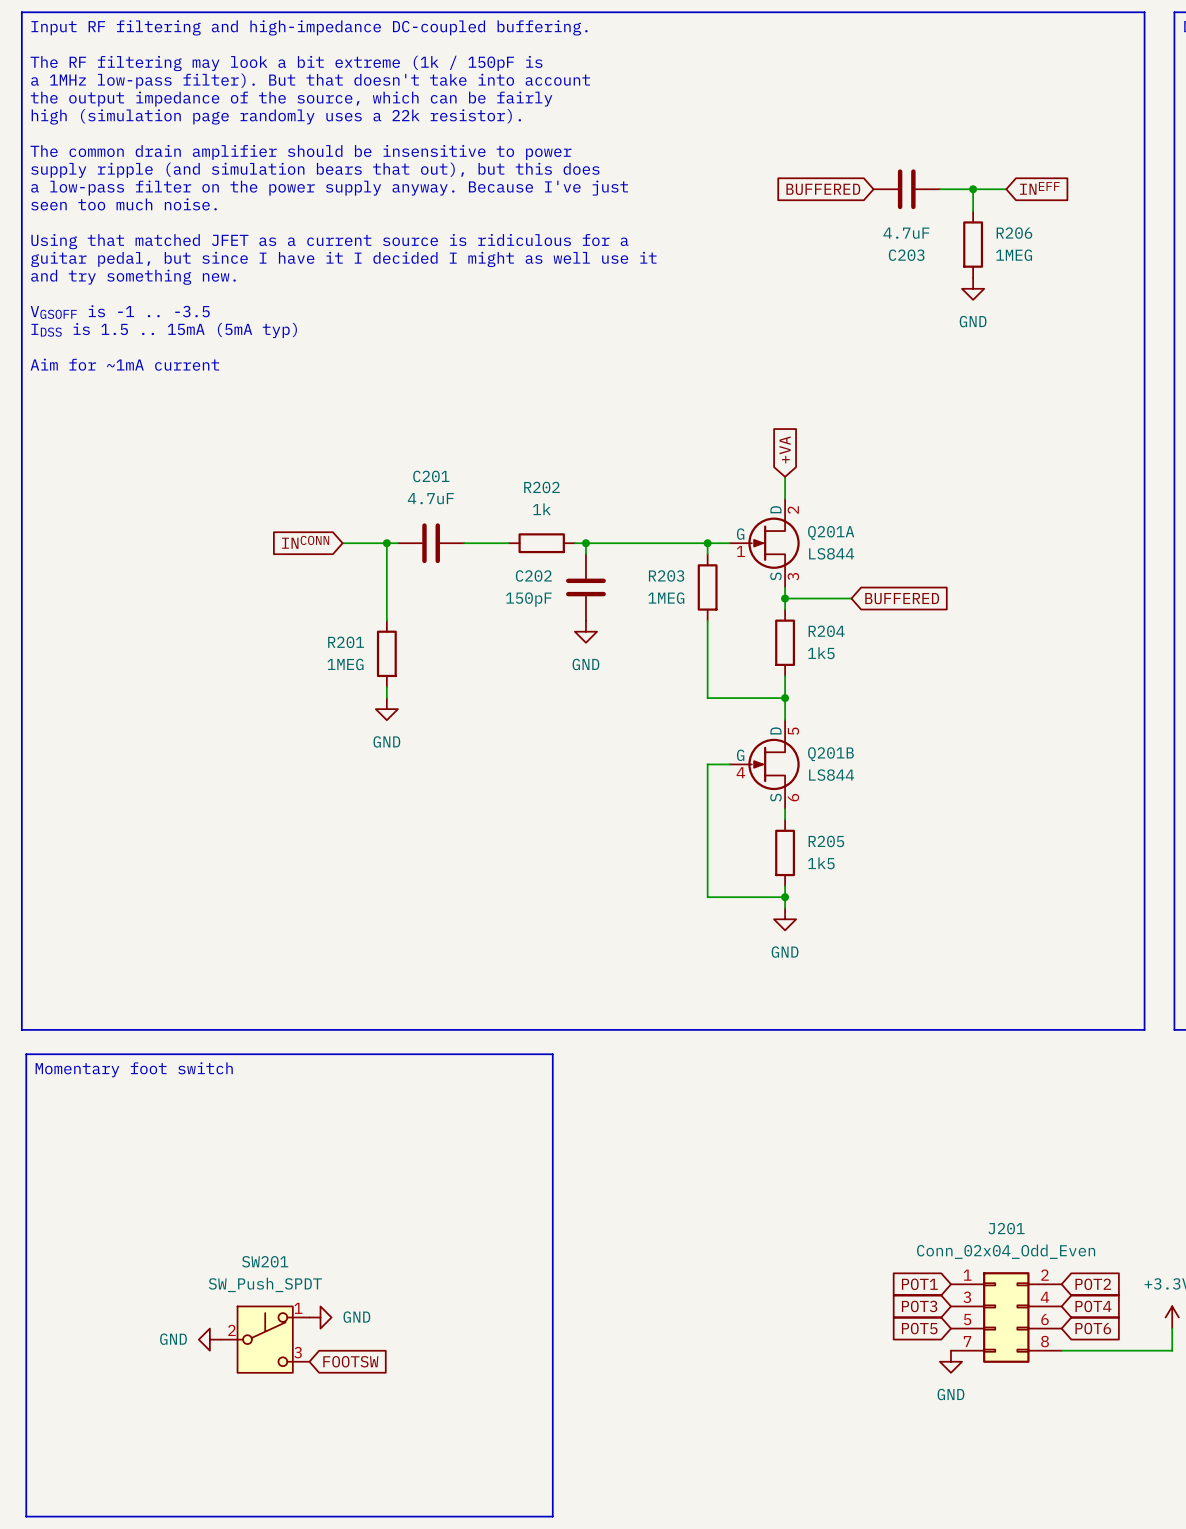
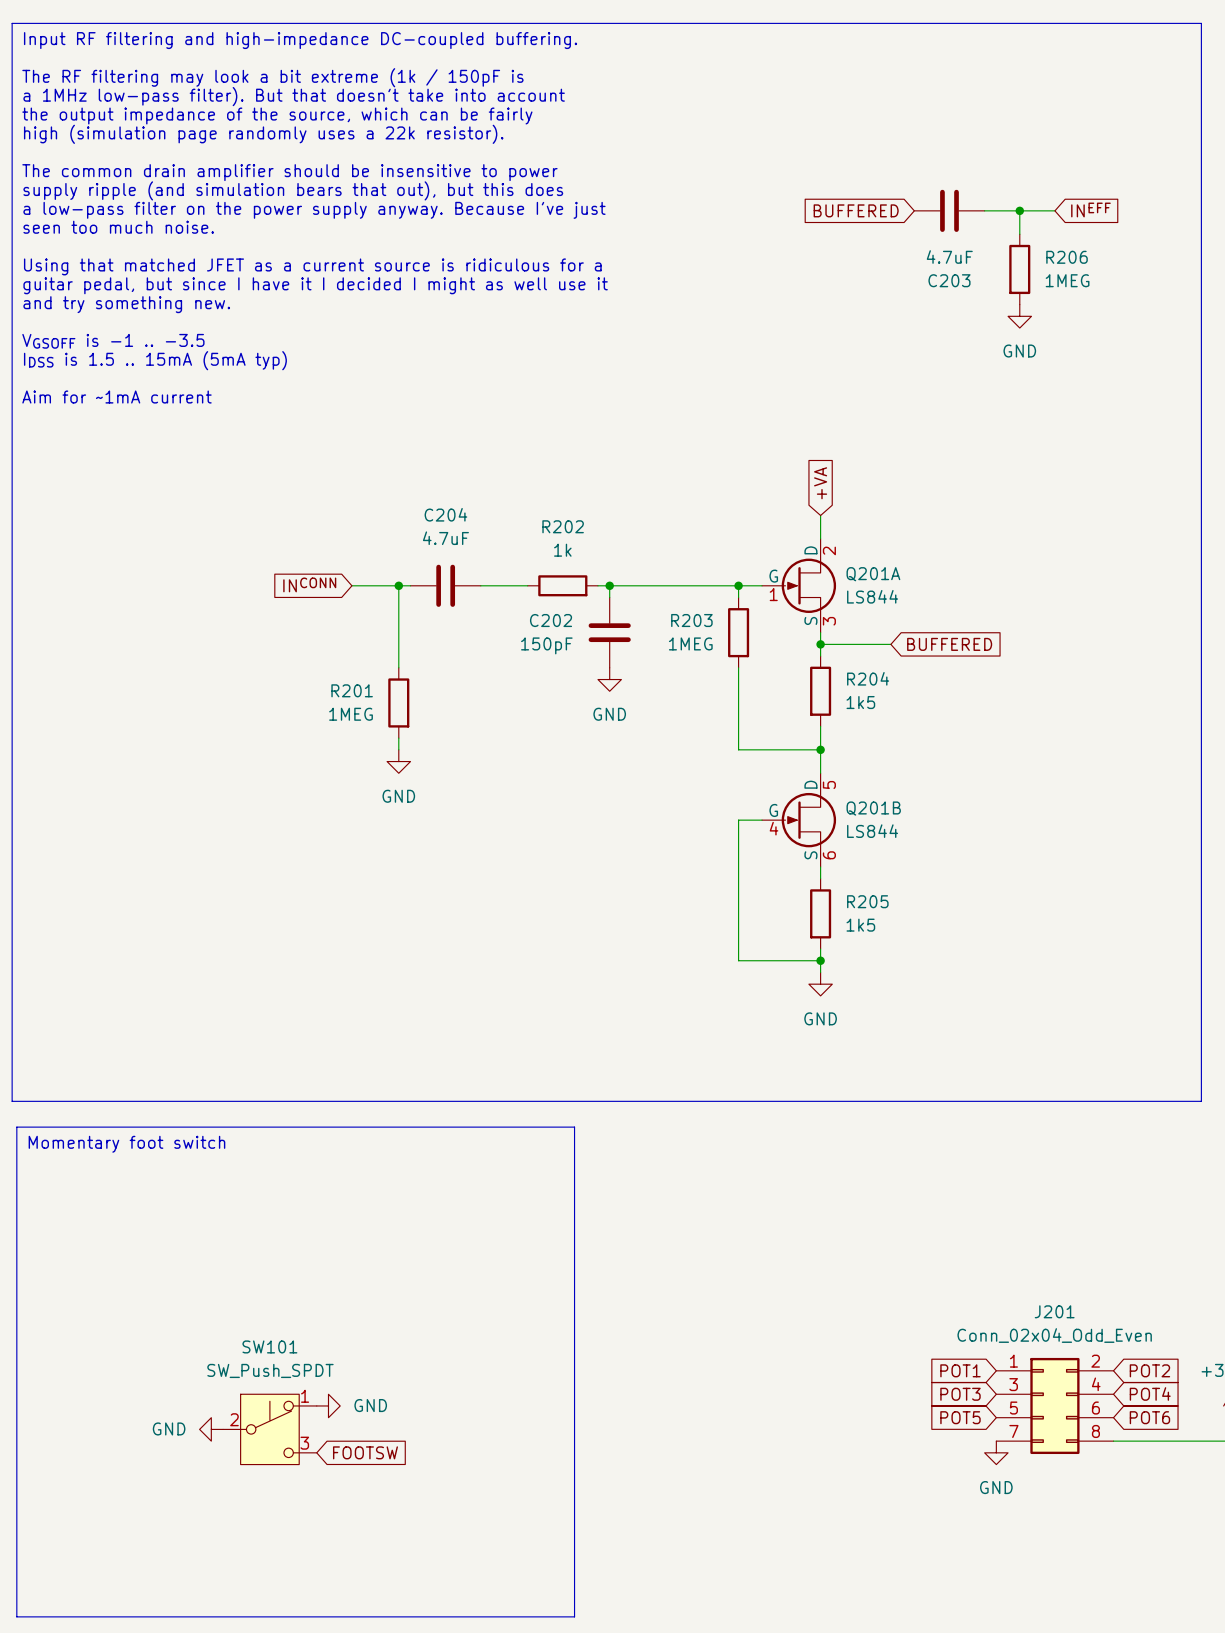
C201 name: C201 (431, 476) -> C204 (445, 514)
SW201 name: SW201 (265, 1261) -> SW101 (269, 1346)

